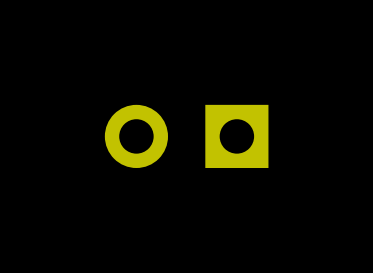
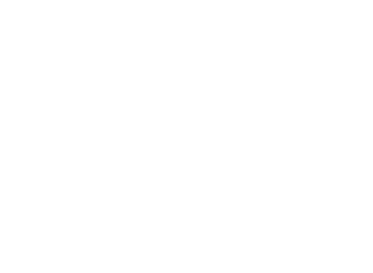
part: (186, 136) -> none

